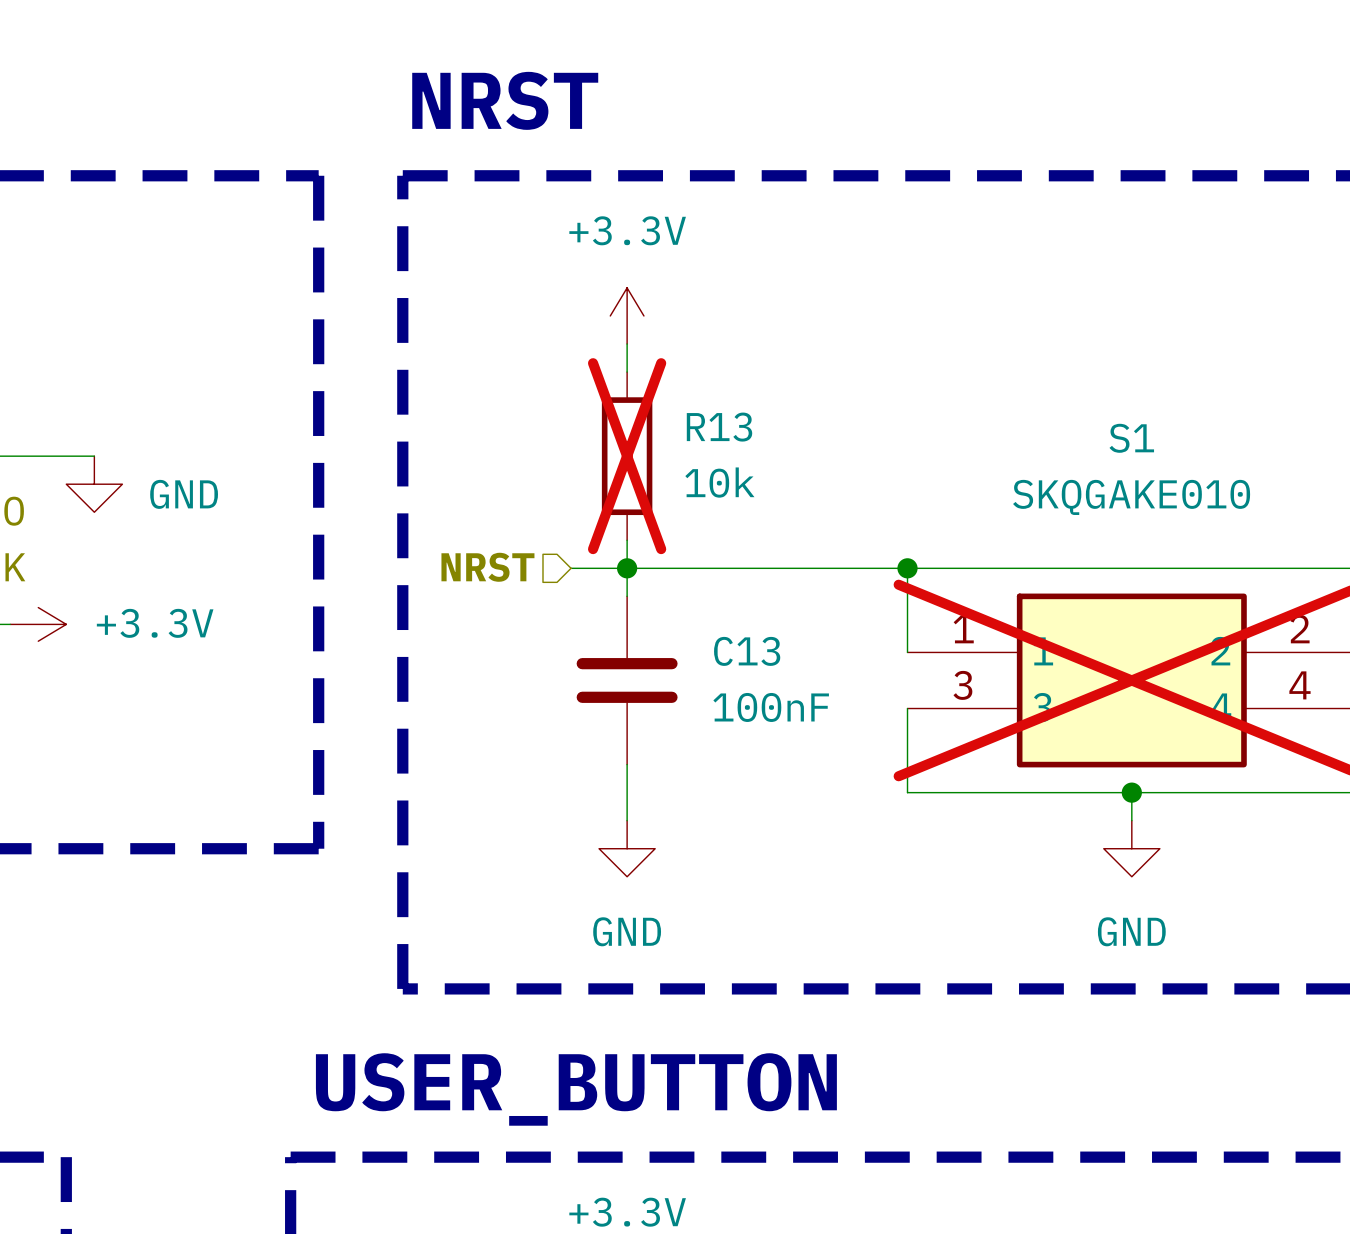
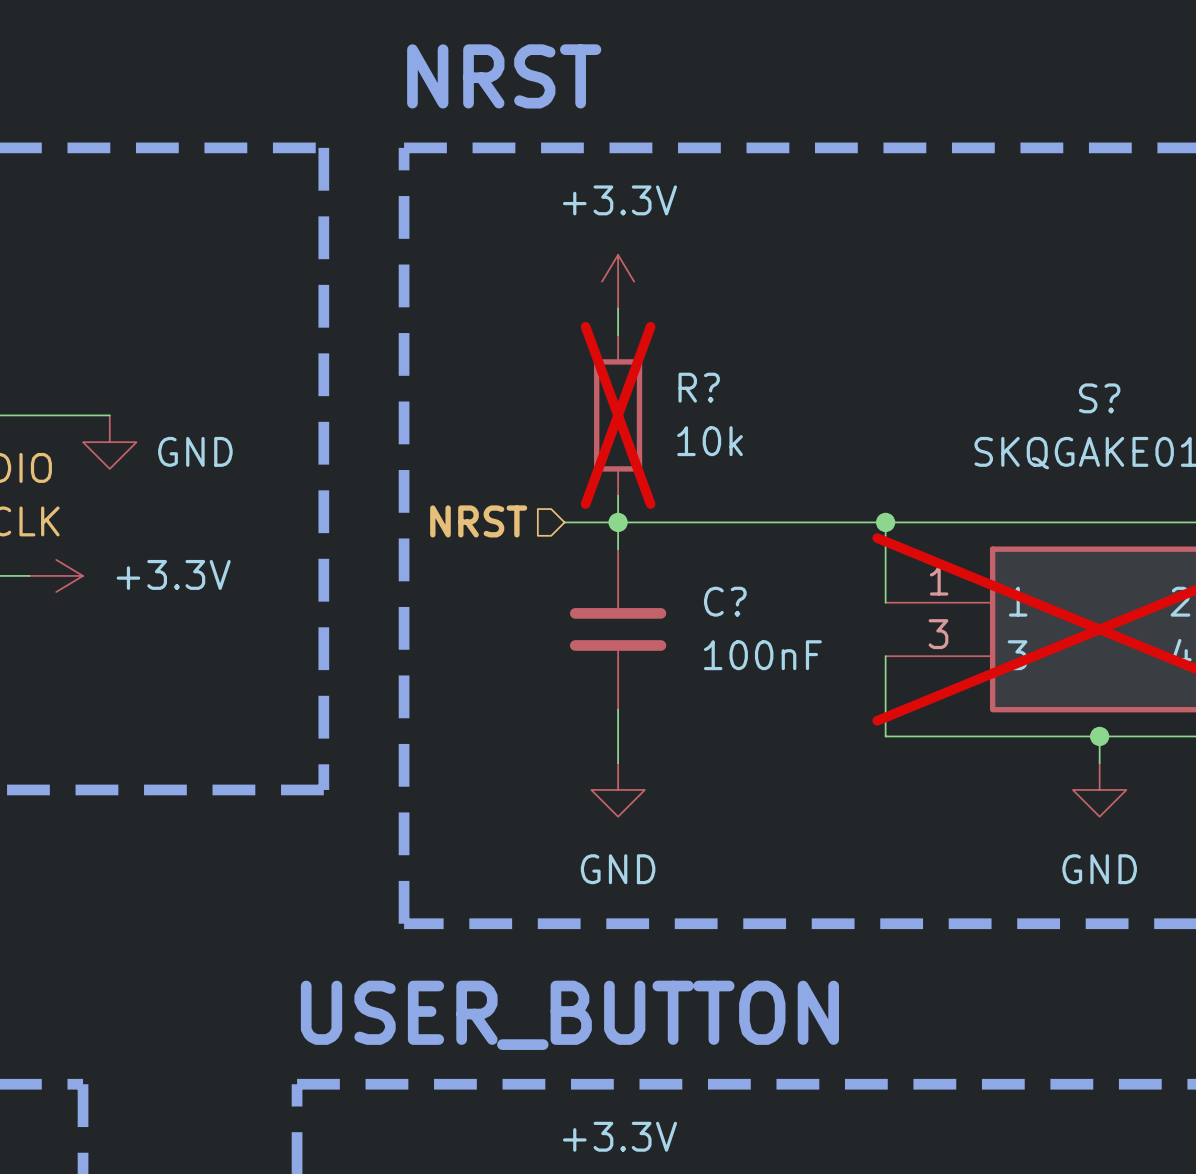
R13 name: R13 (719, 427) -> R? (699, 387)
S1 name: S1 (1131, 438) -> S? (1099, 398)
C13 name: C13 (747, 651) -> C? (725, 601)

